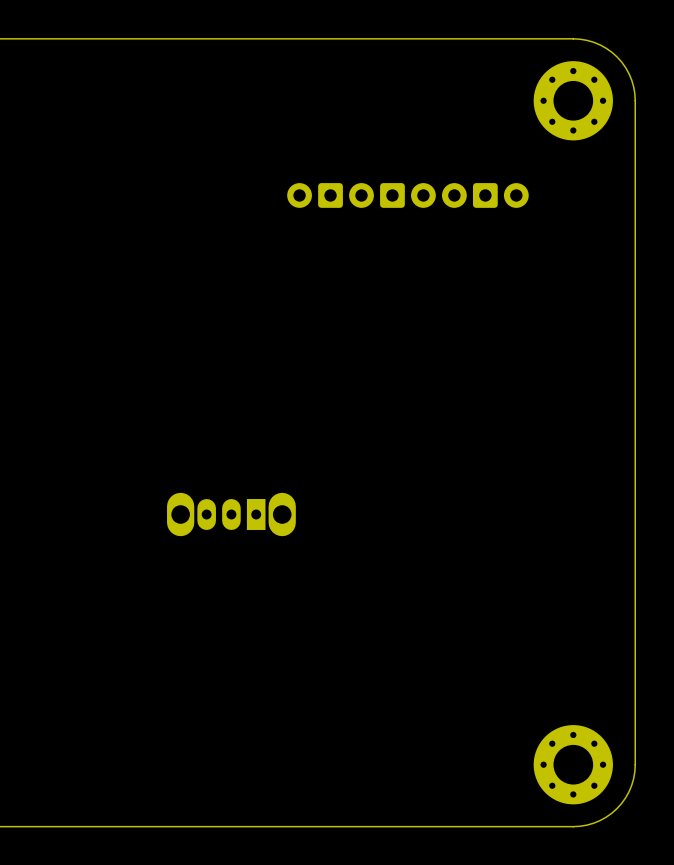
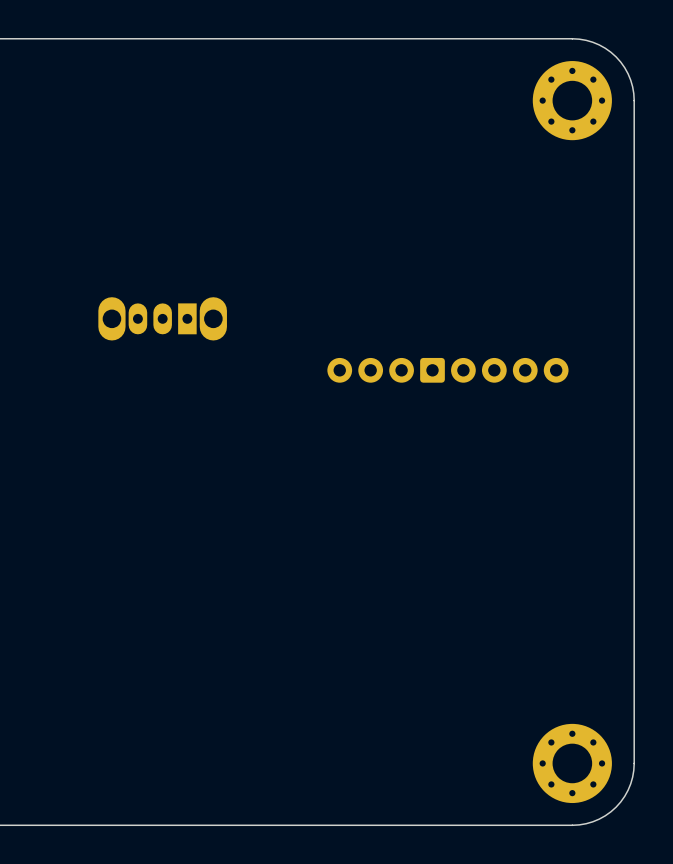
part: (407, 195) -> none
part: none -> (447, 370)
part position: (231, 514) -> (162, 318)

